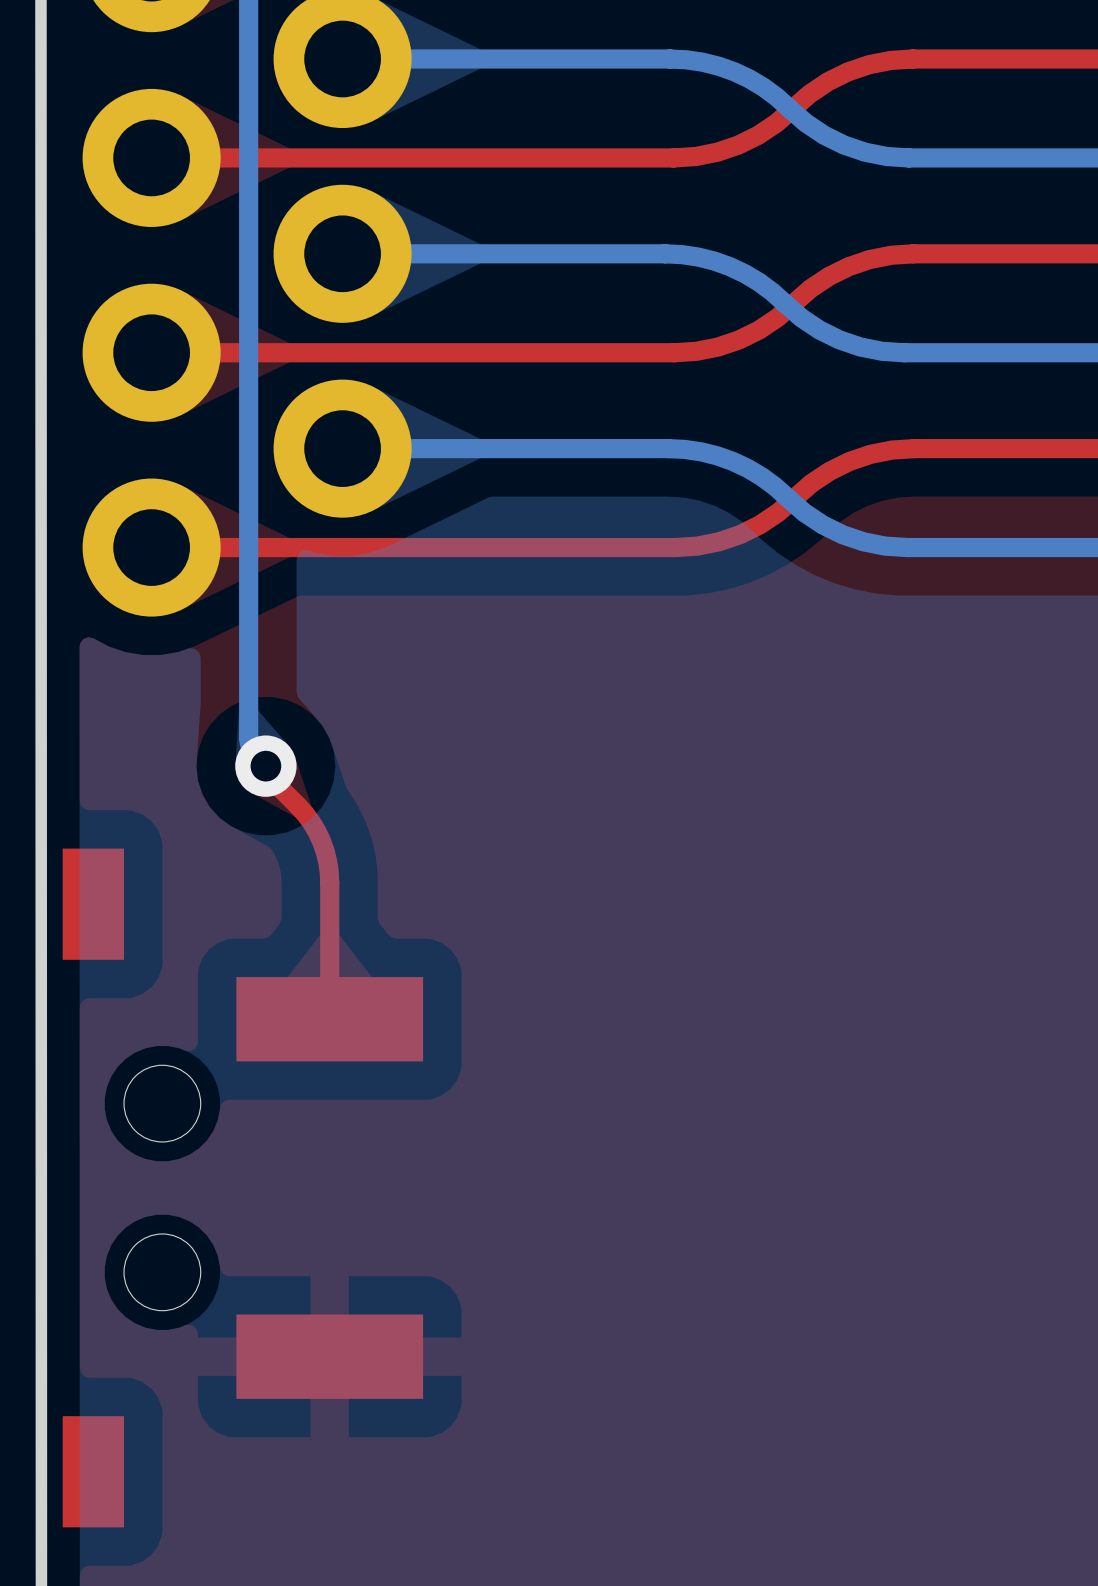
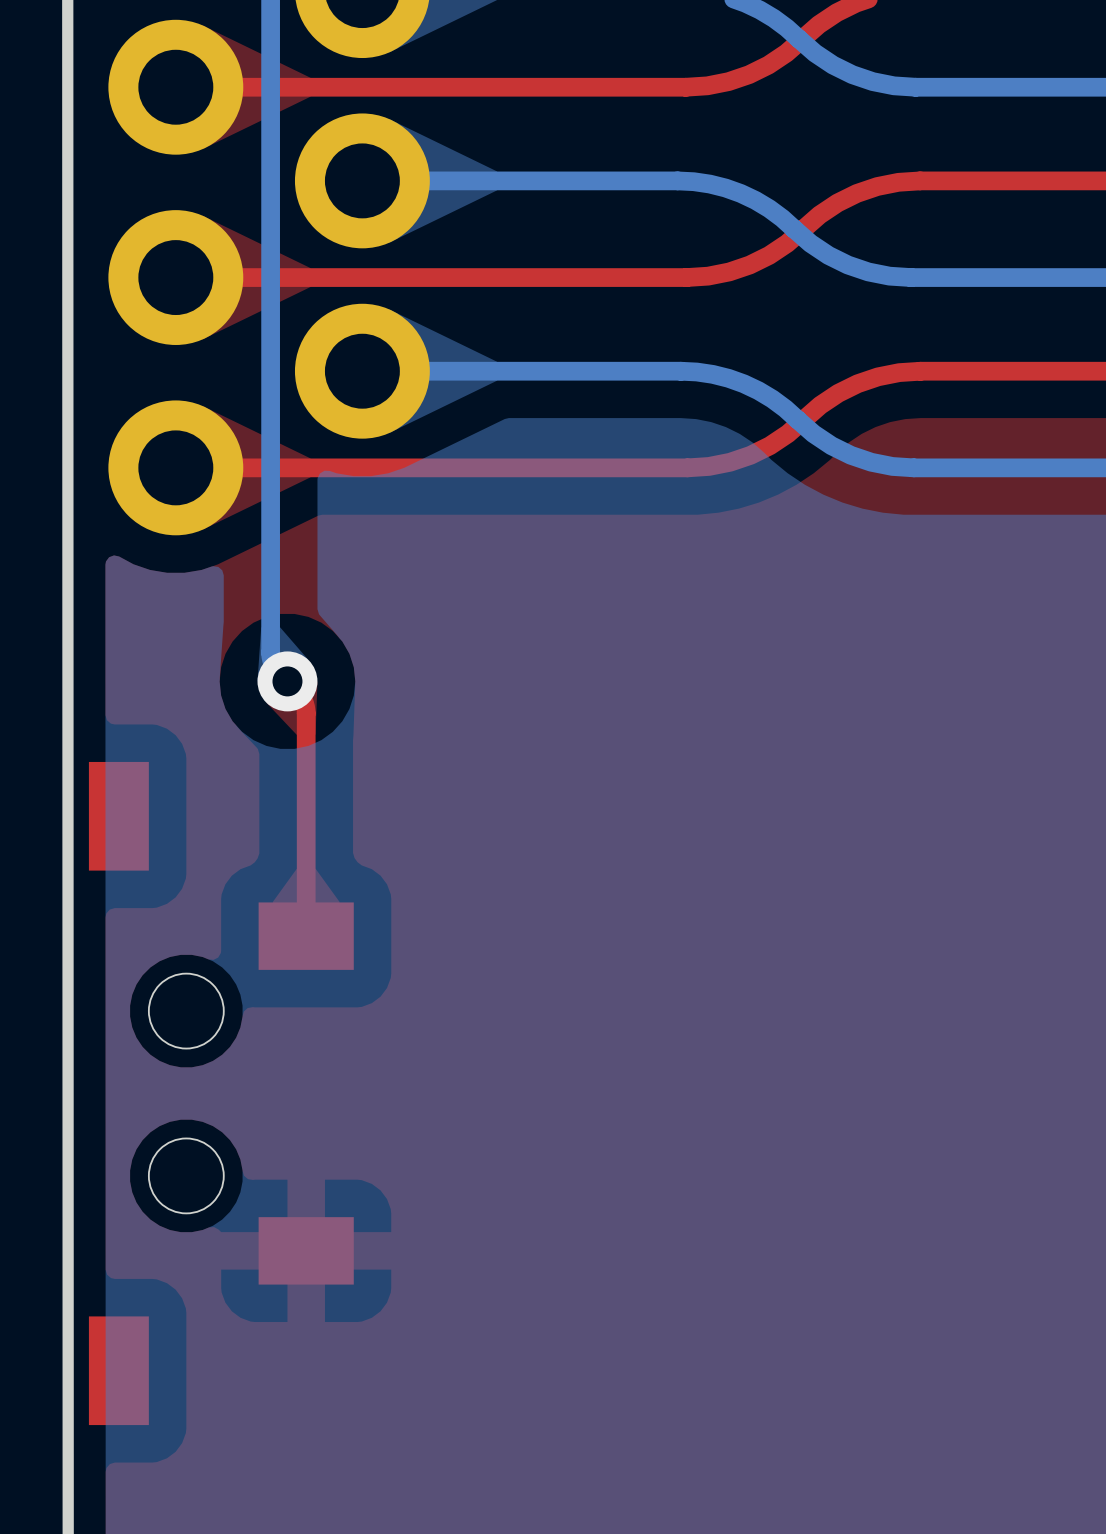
top track: (265, 766) (267, 775) (311, 822) (325, 851) (329, 882) (329, 1019) -> (287, 681) (300, 695) (306, 710) (306, 936)
part footprint: [62, 848, 424, 1528] -> [88, 761, 354, 1426]

